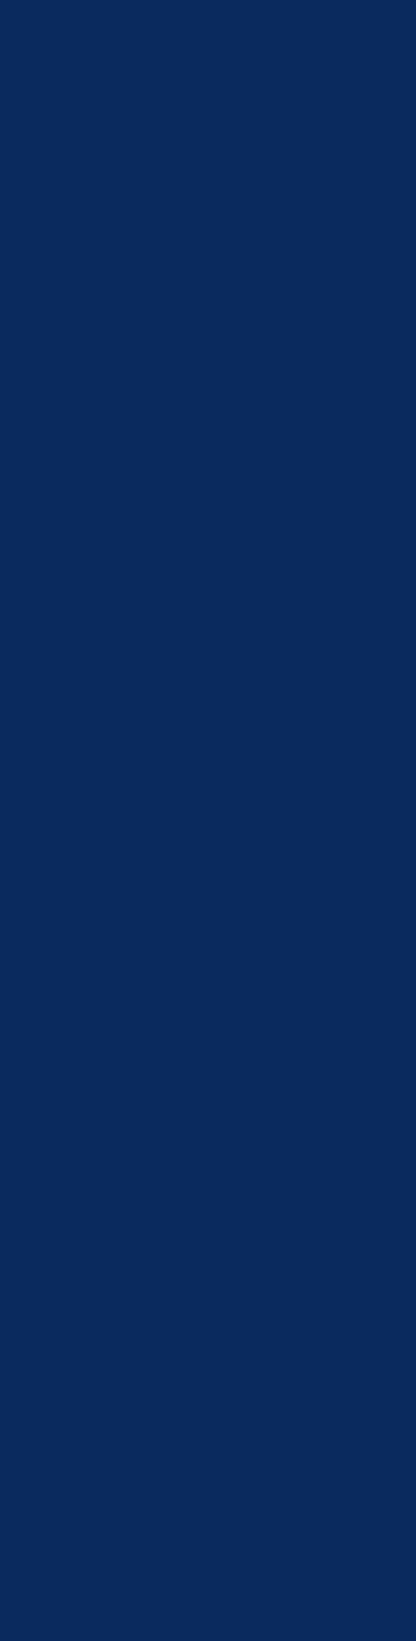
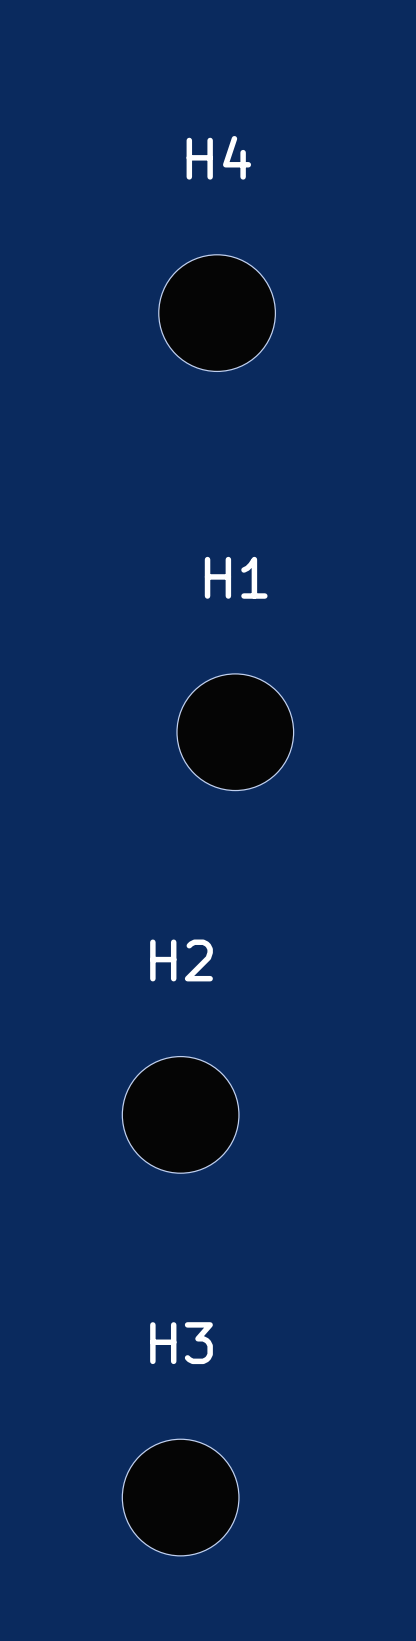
H4: none -> (217, 313)
H1: none -> (235, 732)
H2: none -> (180, 1114)
H3: none -> (180, 1497)

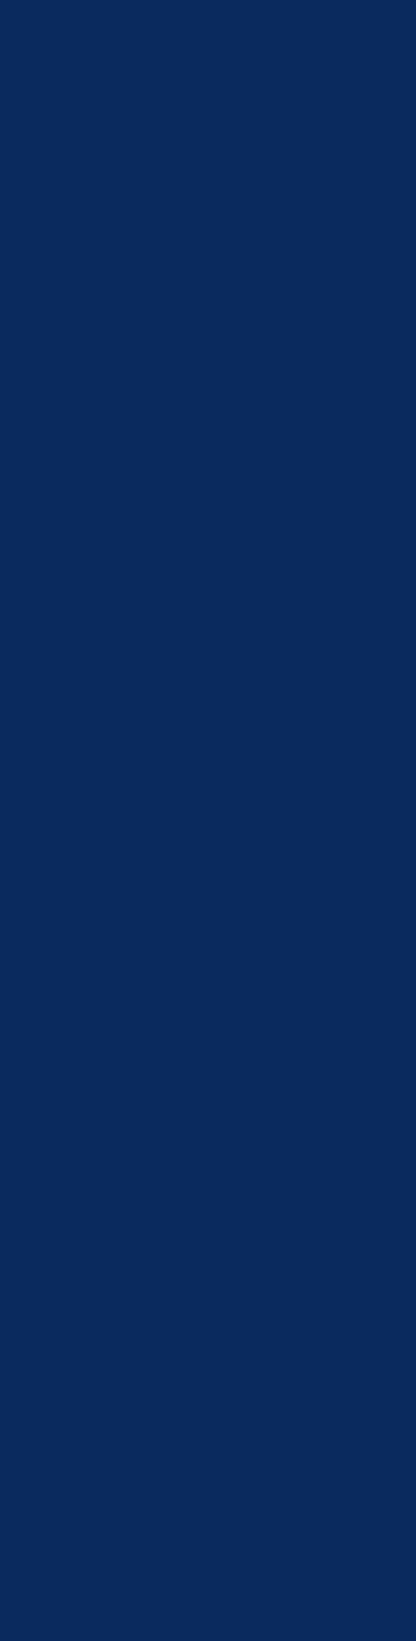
H4: (217, 313) -> none
H1: (235, 732) -> none
H2: (180, 1114) -> none
H3: (180, 1497) -> none

